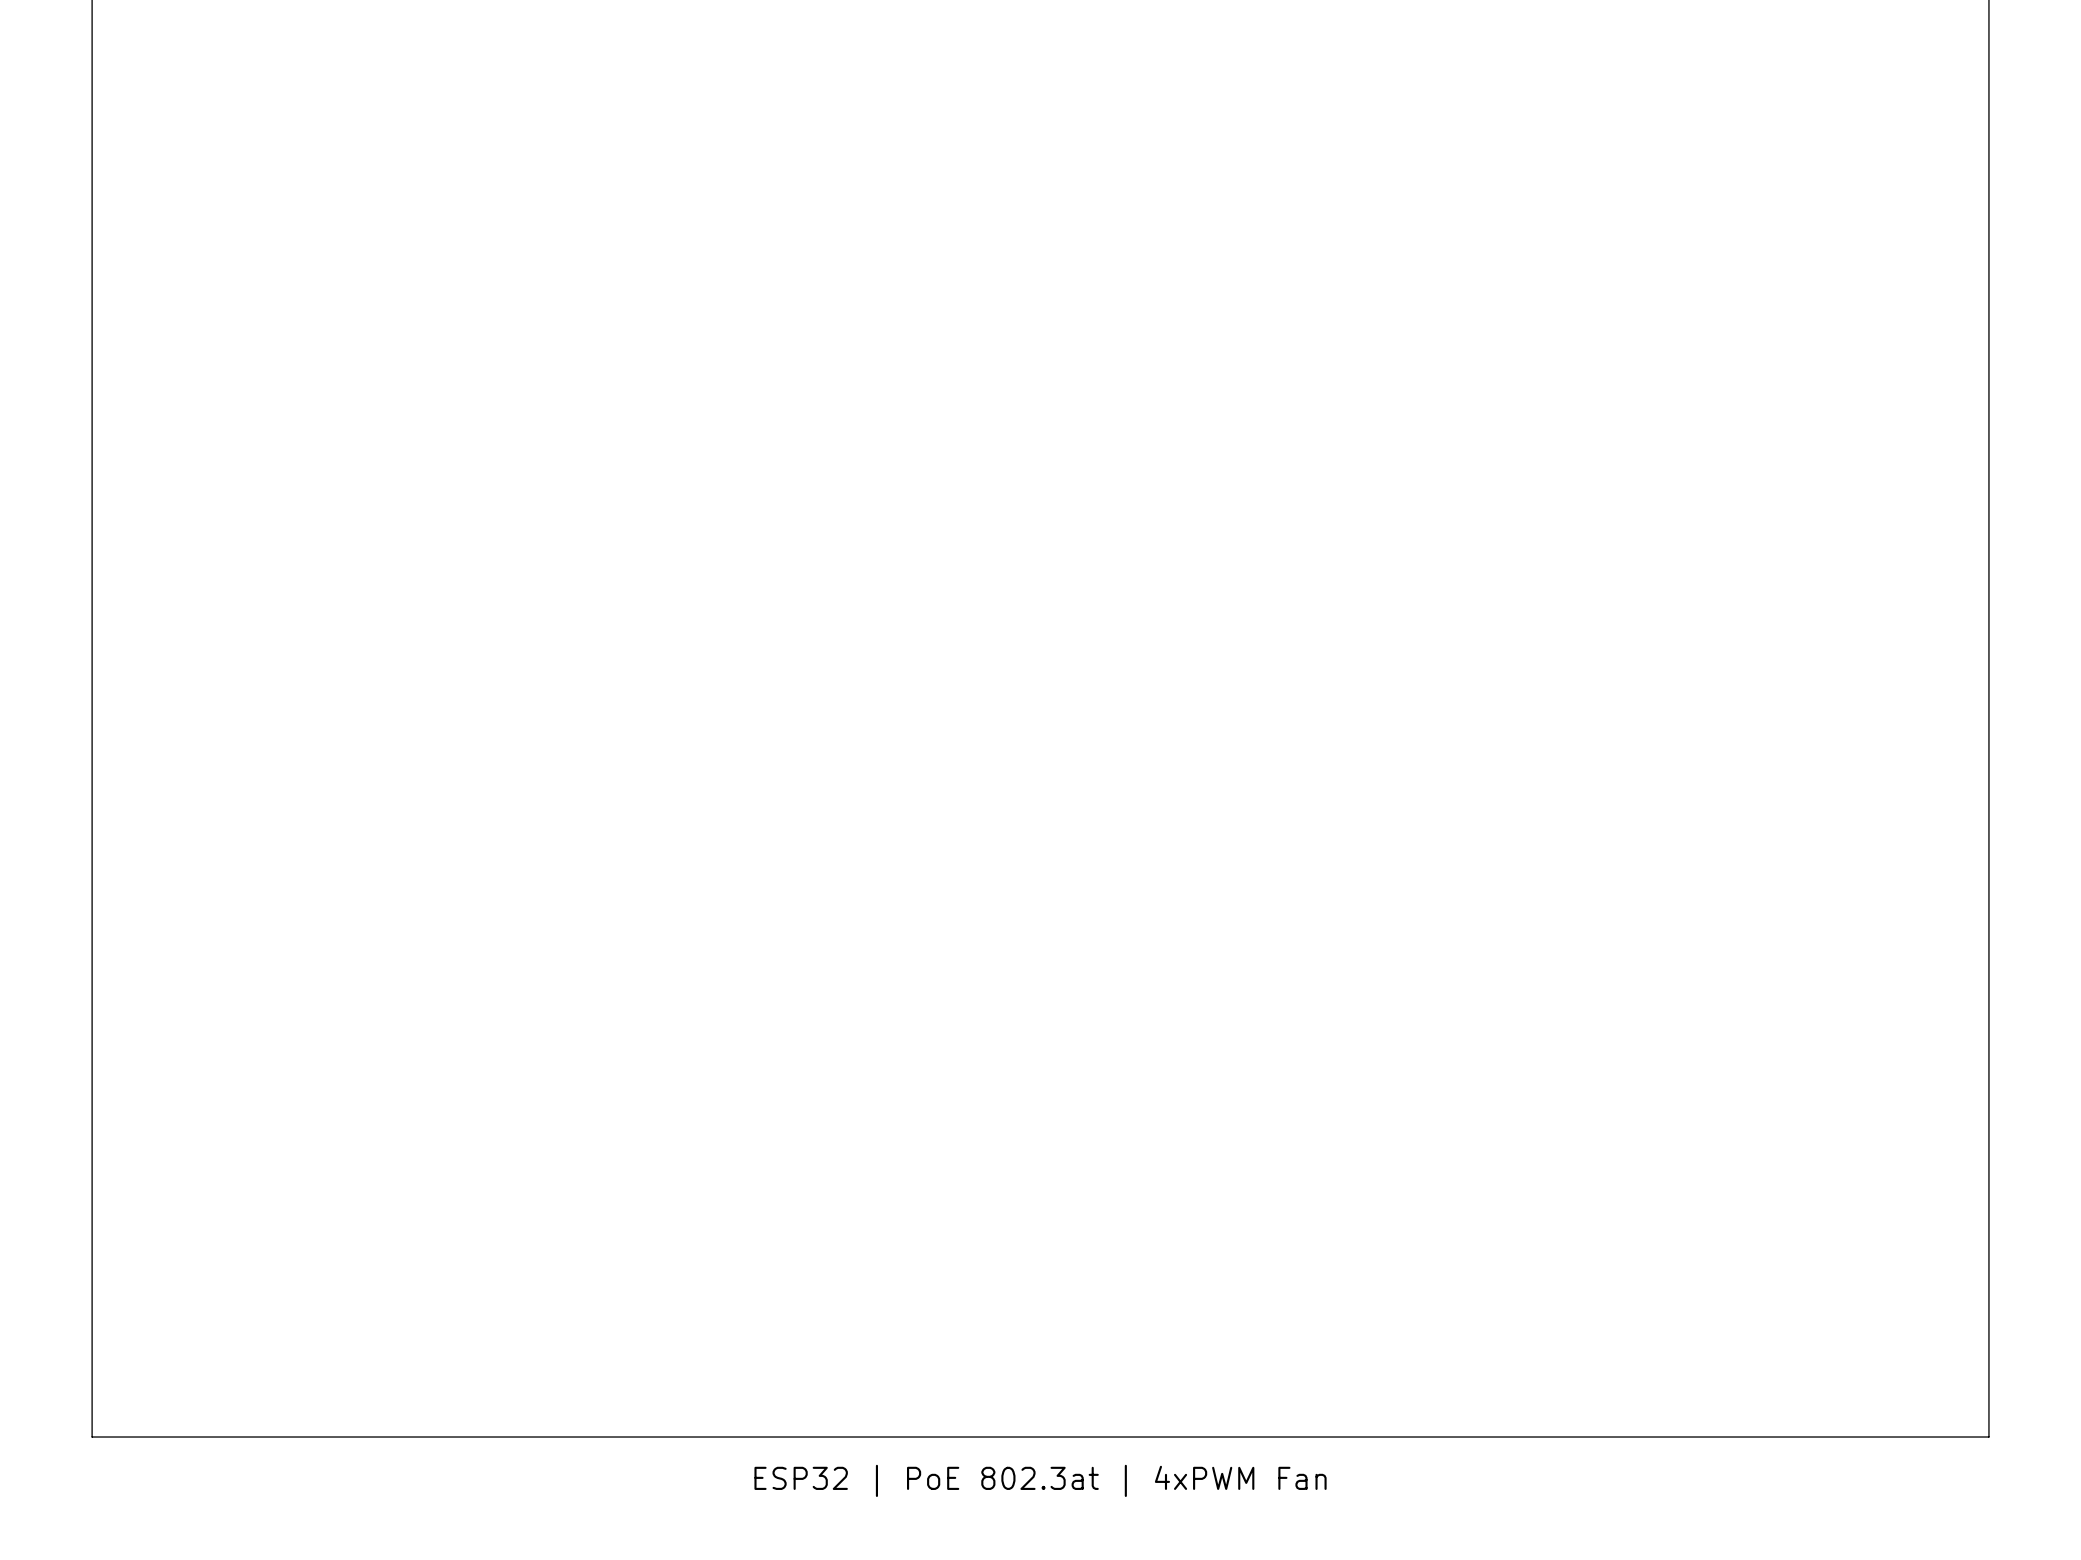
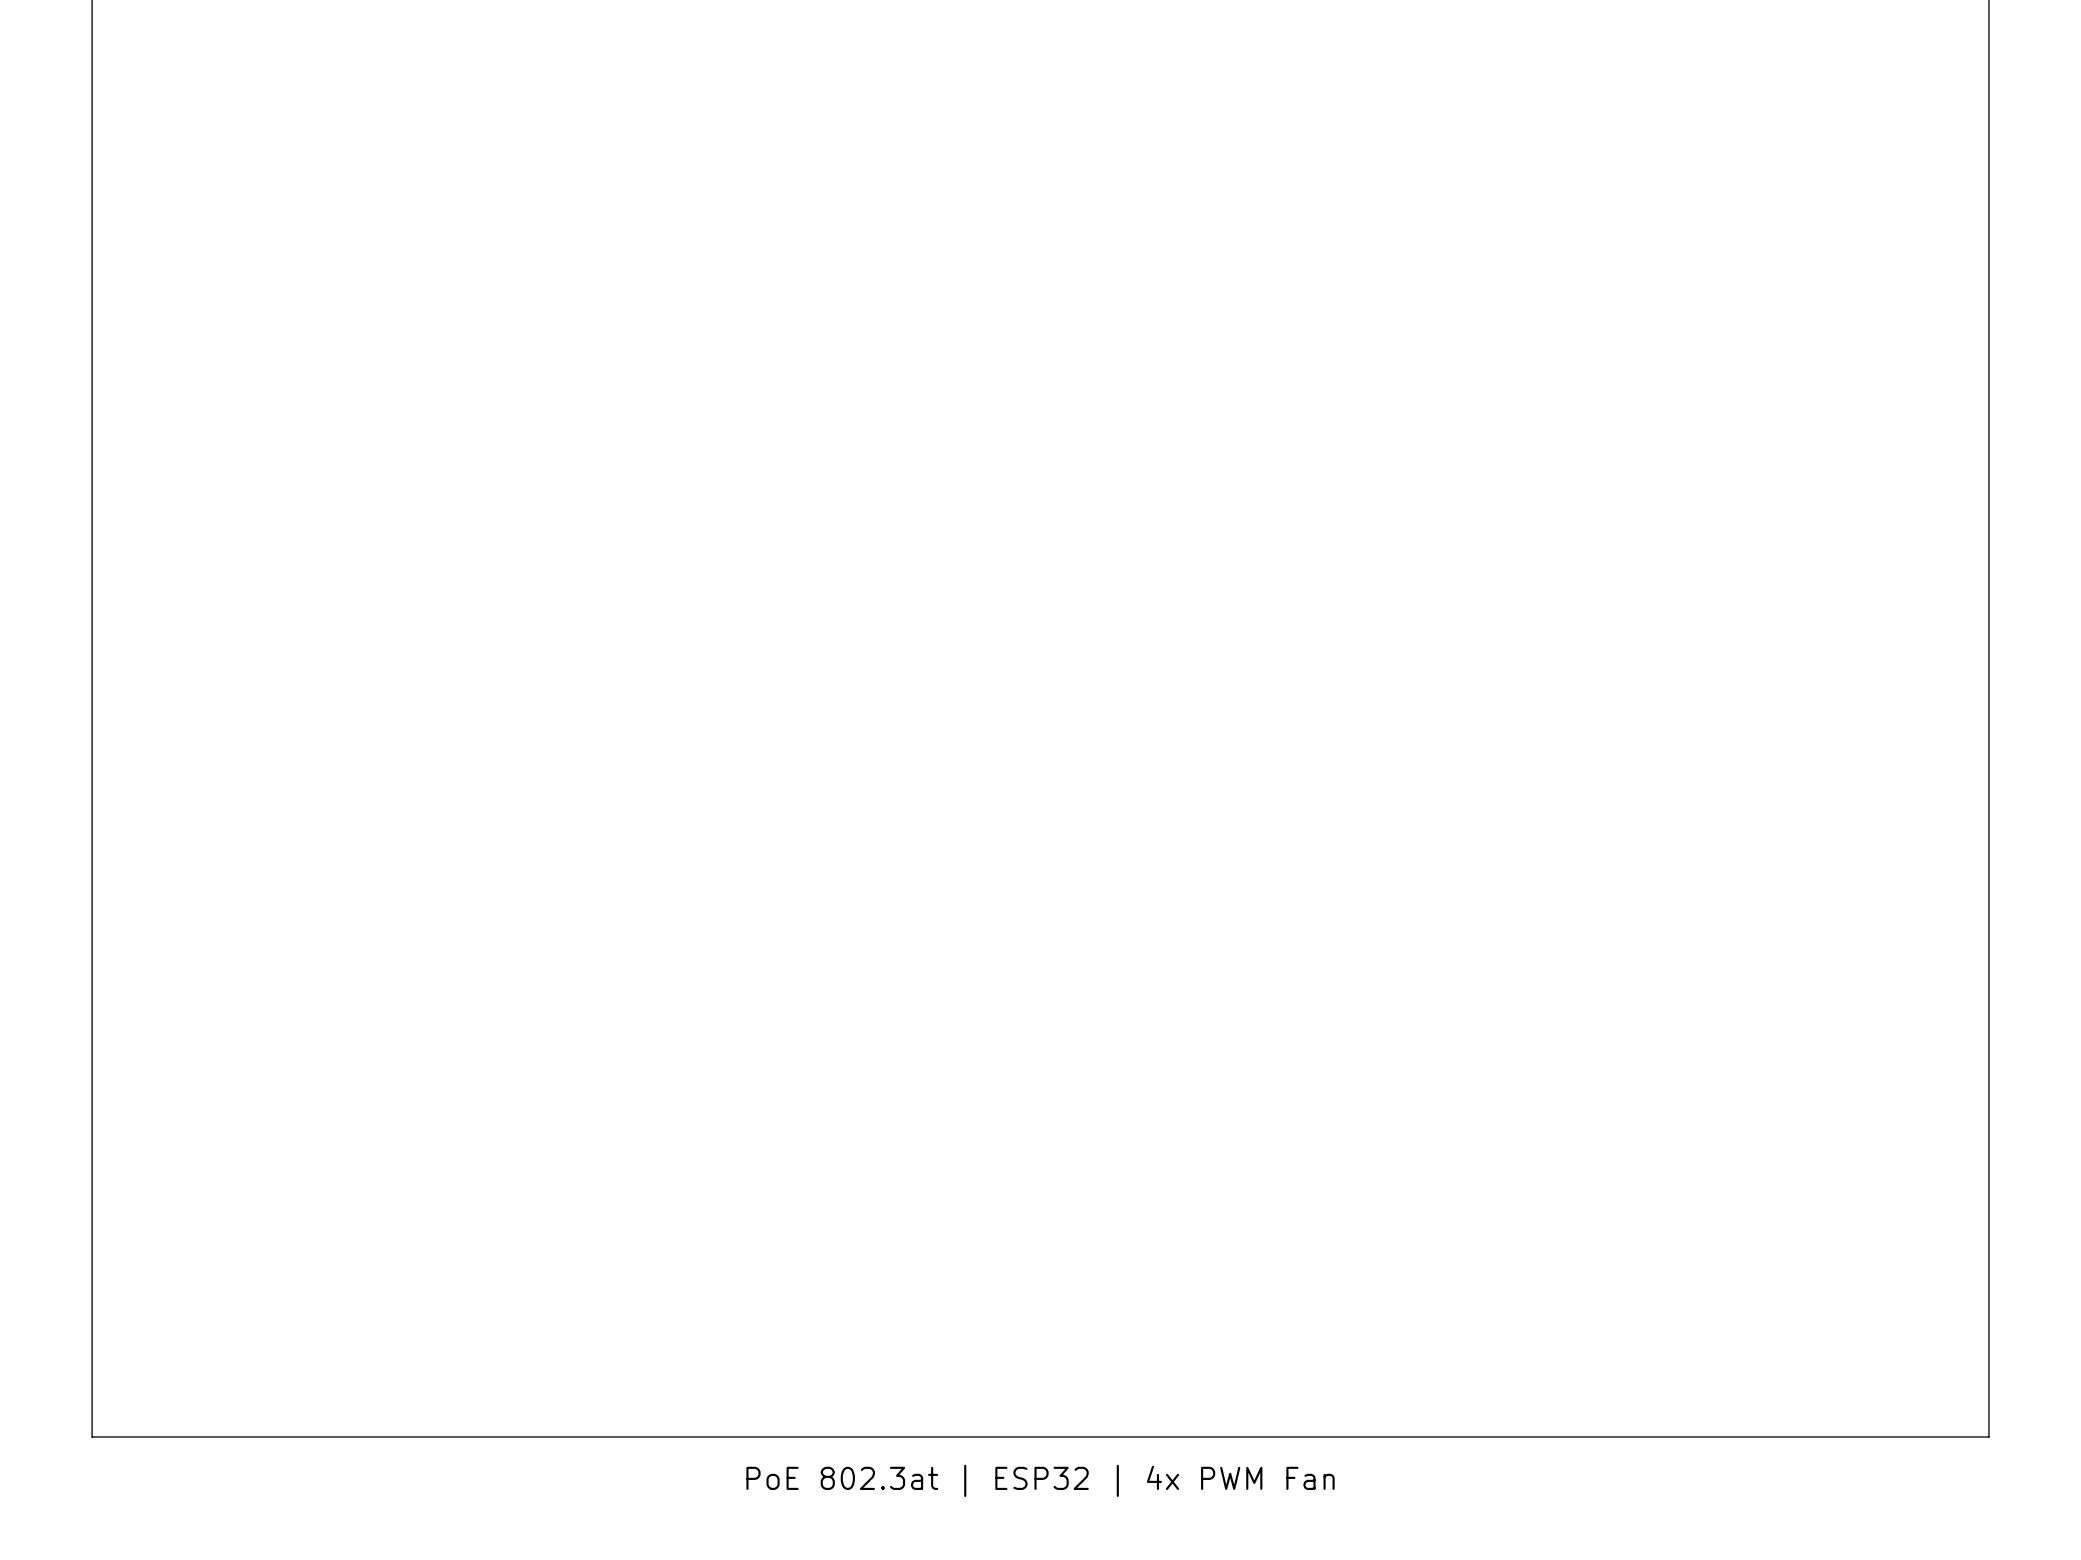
text: ESP32 | PoE 802.3at | 4xPWM Fan (1040, 1480) -> PoE 802.3at | ESP32 | 4x PWM Fan (1040, 1480)

